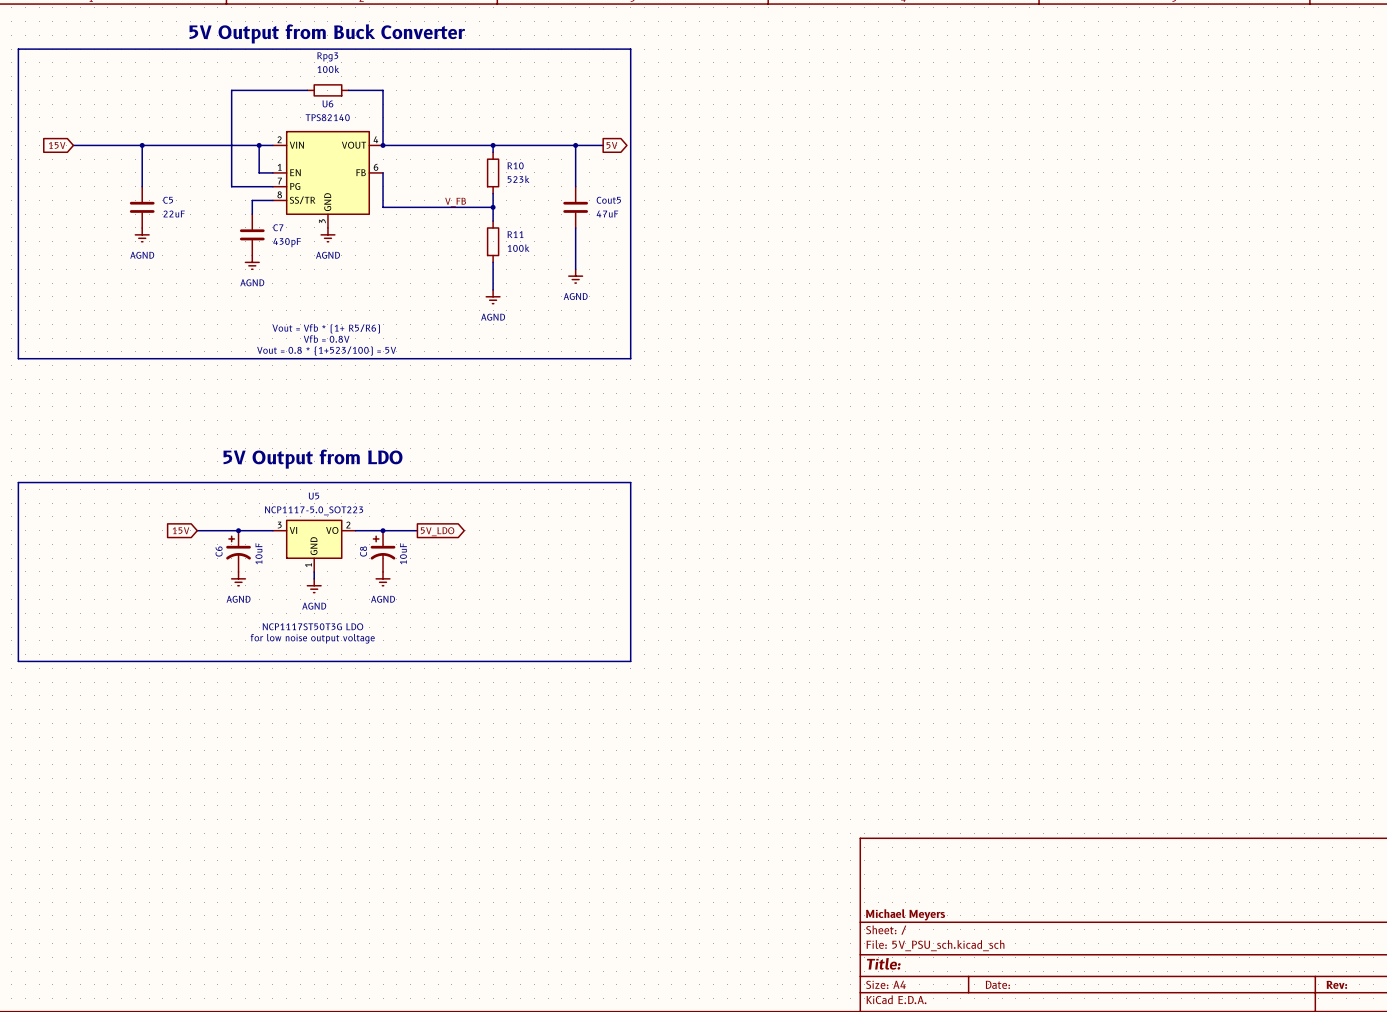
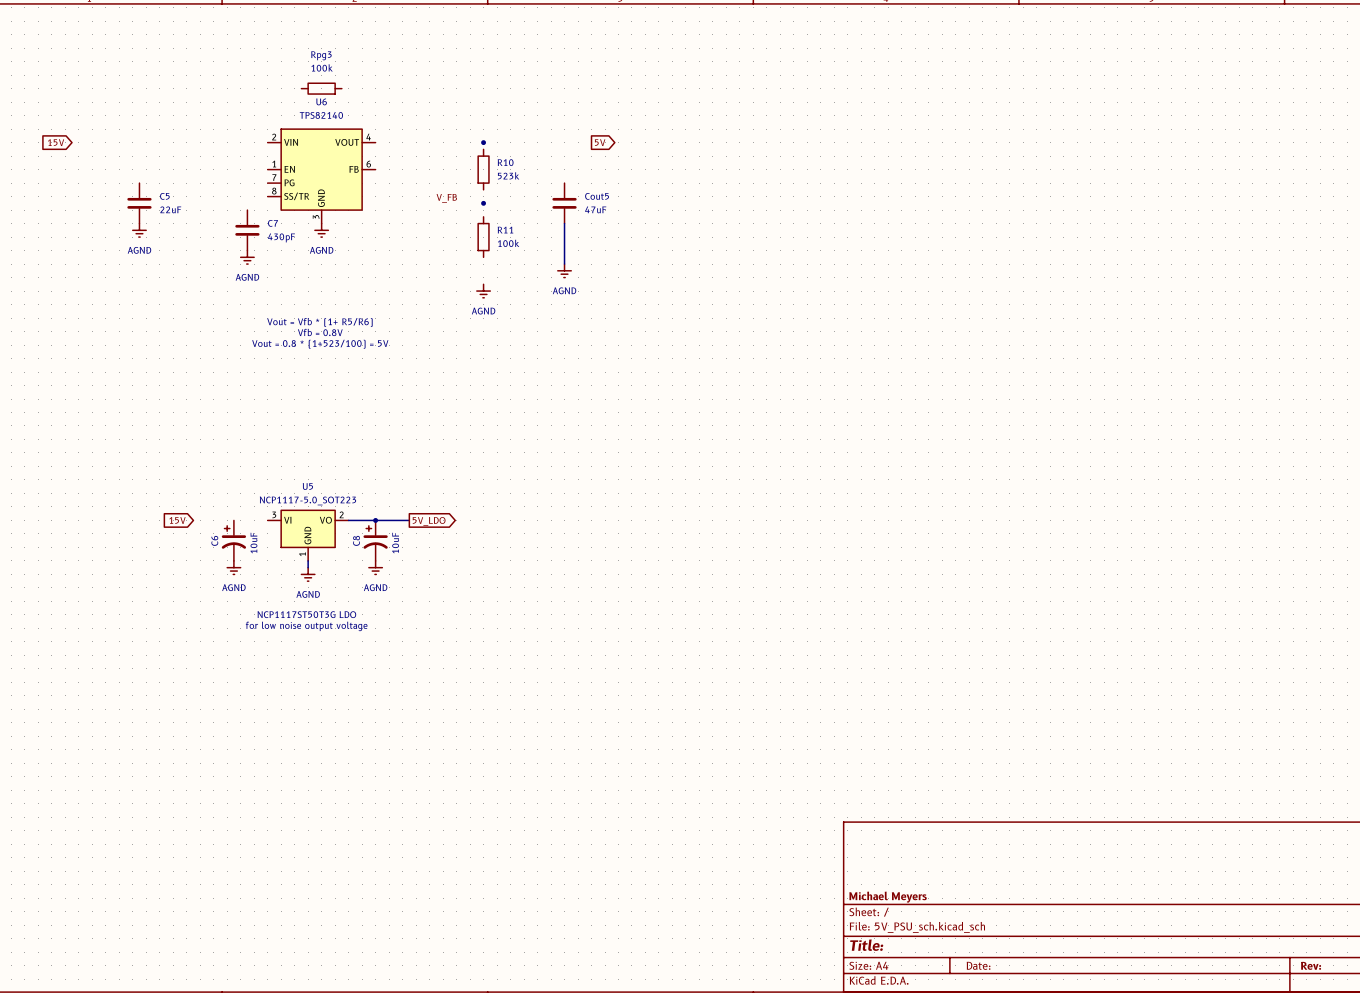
text: 5V Output from Buck Converter (327, 33) -> none
line: (18, 49) (630, 49) (630, 358) (18, 358) (18, 49) -> none
wire: (307, 90) (231, 90) (231, 186) (272, 186) -> none
wire: (348, 90) (383, 90) (383, 145) (603, 145) -> none
wire: (73, 145) (272, 145) -> none
wire: (142, 145) (142, 186) -> none
junction: (142, 145) -> none
wire: (259, 145) (259, 172) (272, 172) -> none
junction: (259, 145) -> none
junction: (383, 145) -> none
wire: (493, 145) (493, 152) -> none
wire: (575, 145) (575, 186) -> none
junction: (575, 145) -> none
wire: (383, 172) (383, 207) (493, 207) -> none
wire: (493, 193) (493, 221) -> none
wire: (272, 200) (252, 200) (252, 214) -> none
wire: (493, 262) (493, 289) -> none
text: 5V Output from LDO (313, 459) -> none
line: (18, 482) (18, 661) (630, 661) (630, 482) (18, 482) -> none
wire: (197, 530) (272, 530) -> none
junction: (238, 530) -> none

